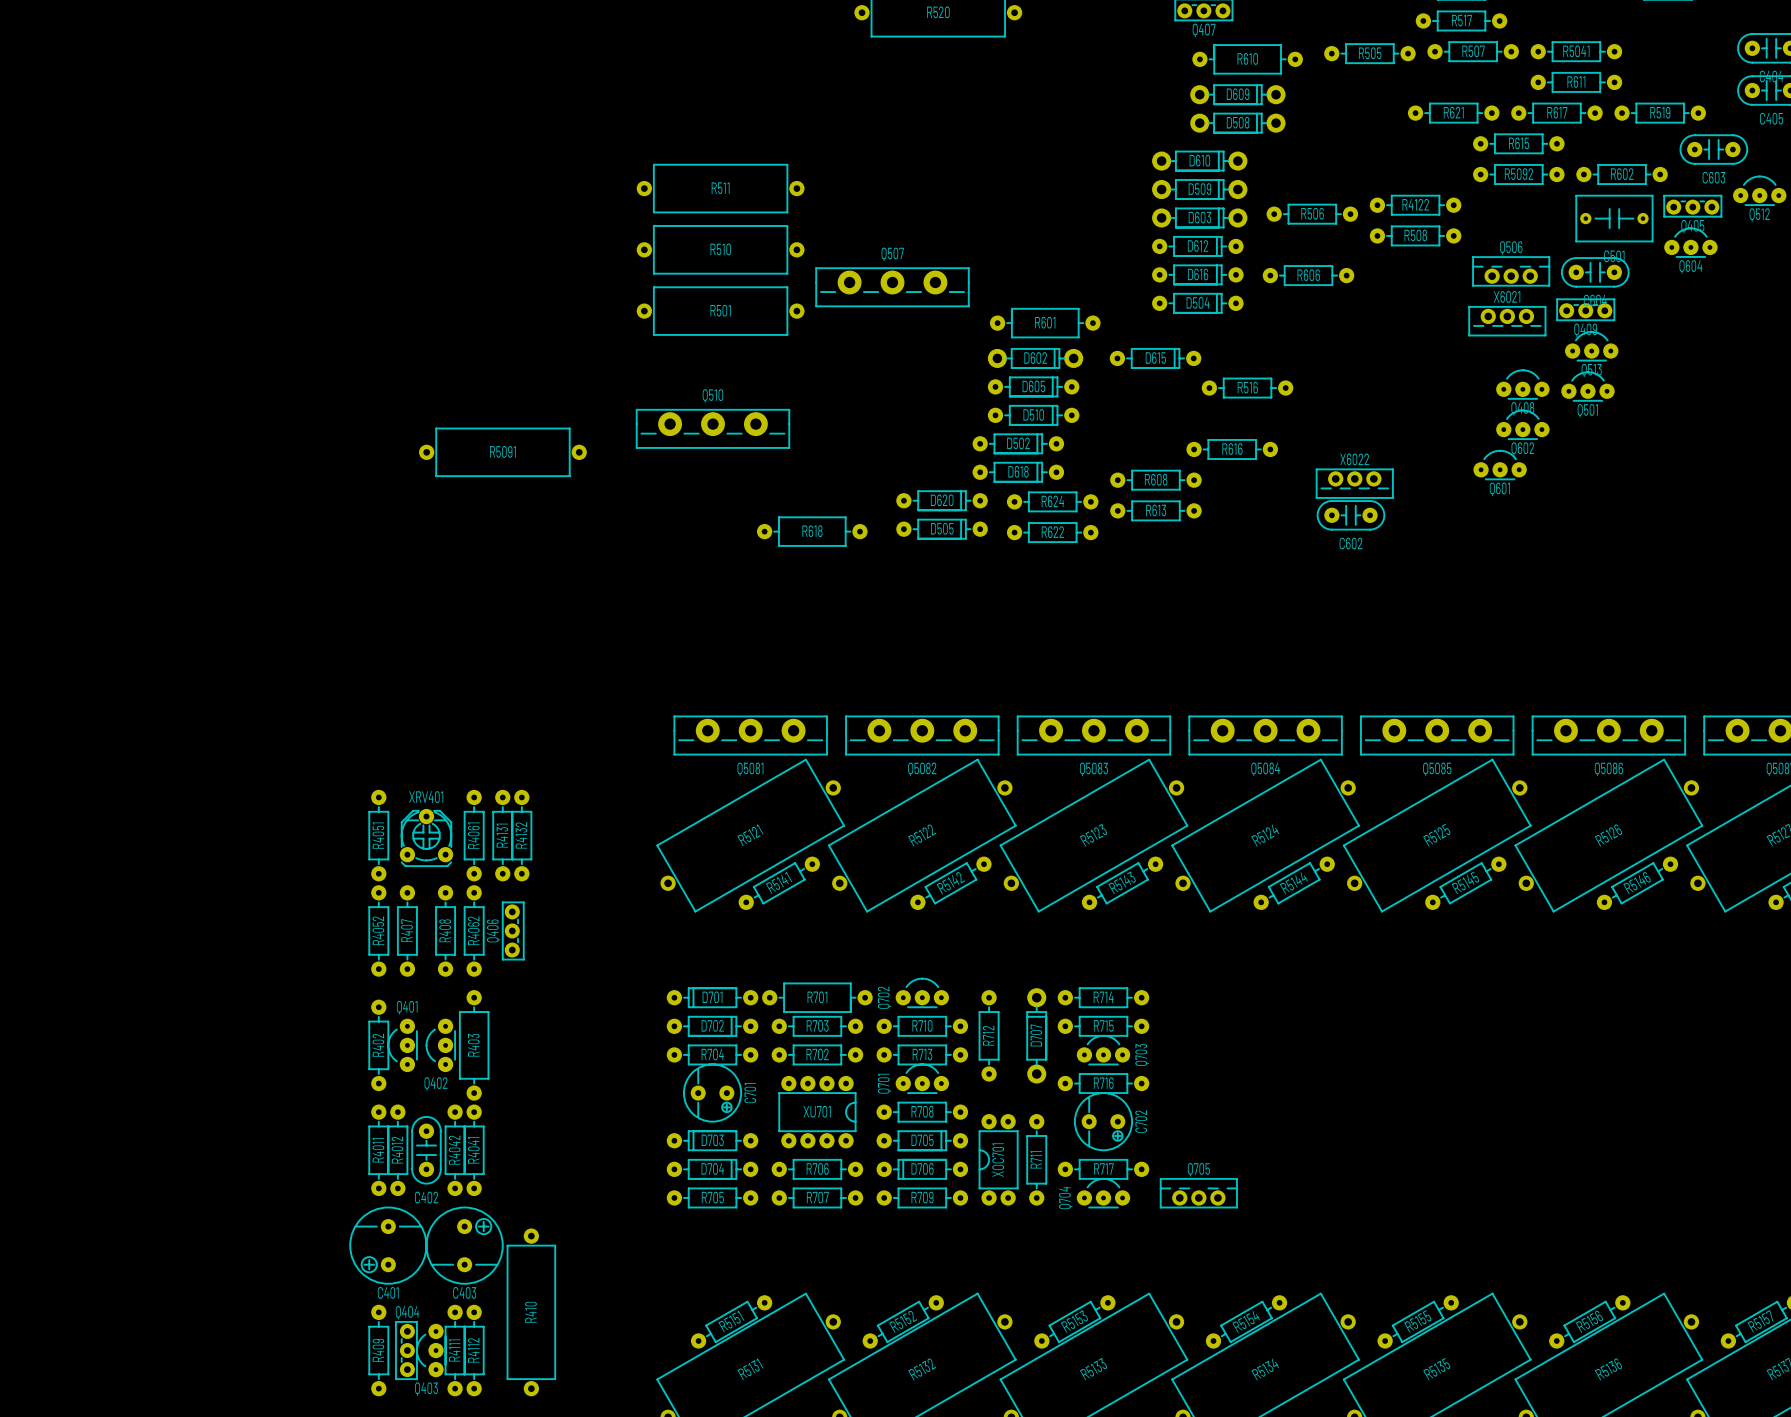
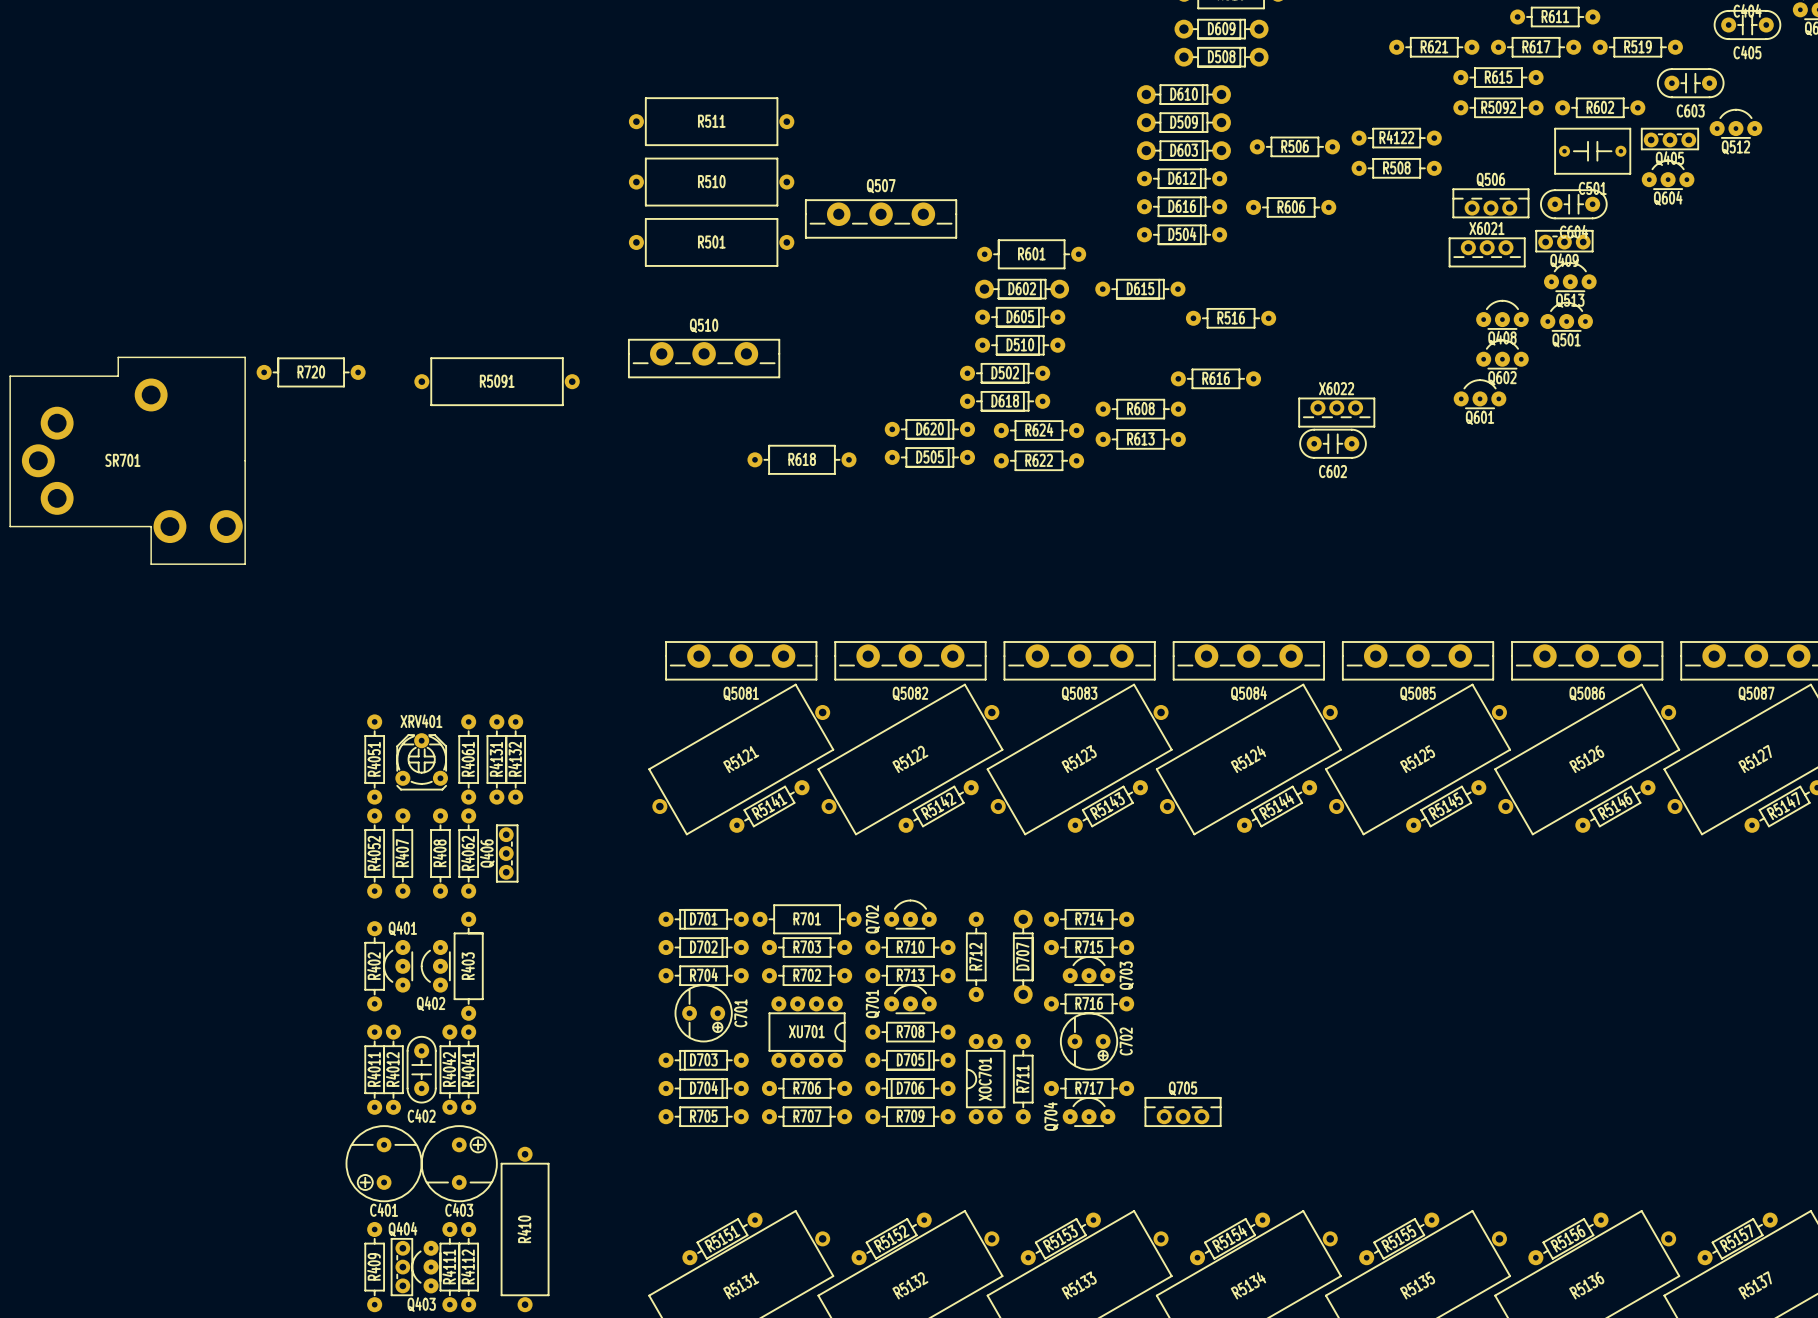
R720: none -> (311, 372)
SR701: none -> (127, 460)

